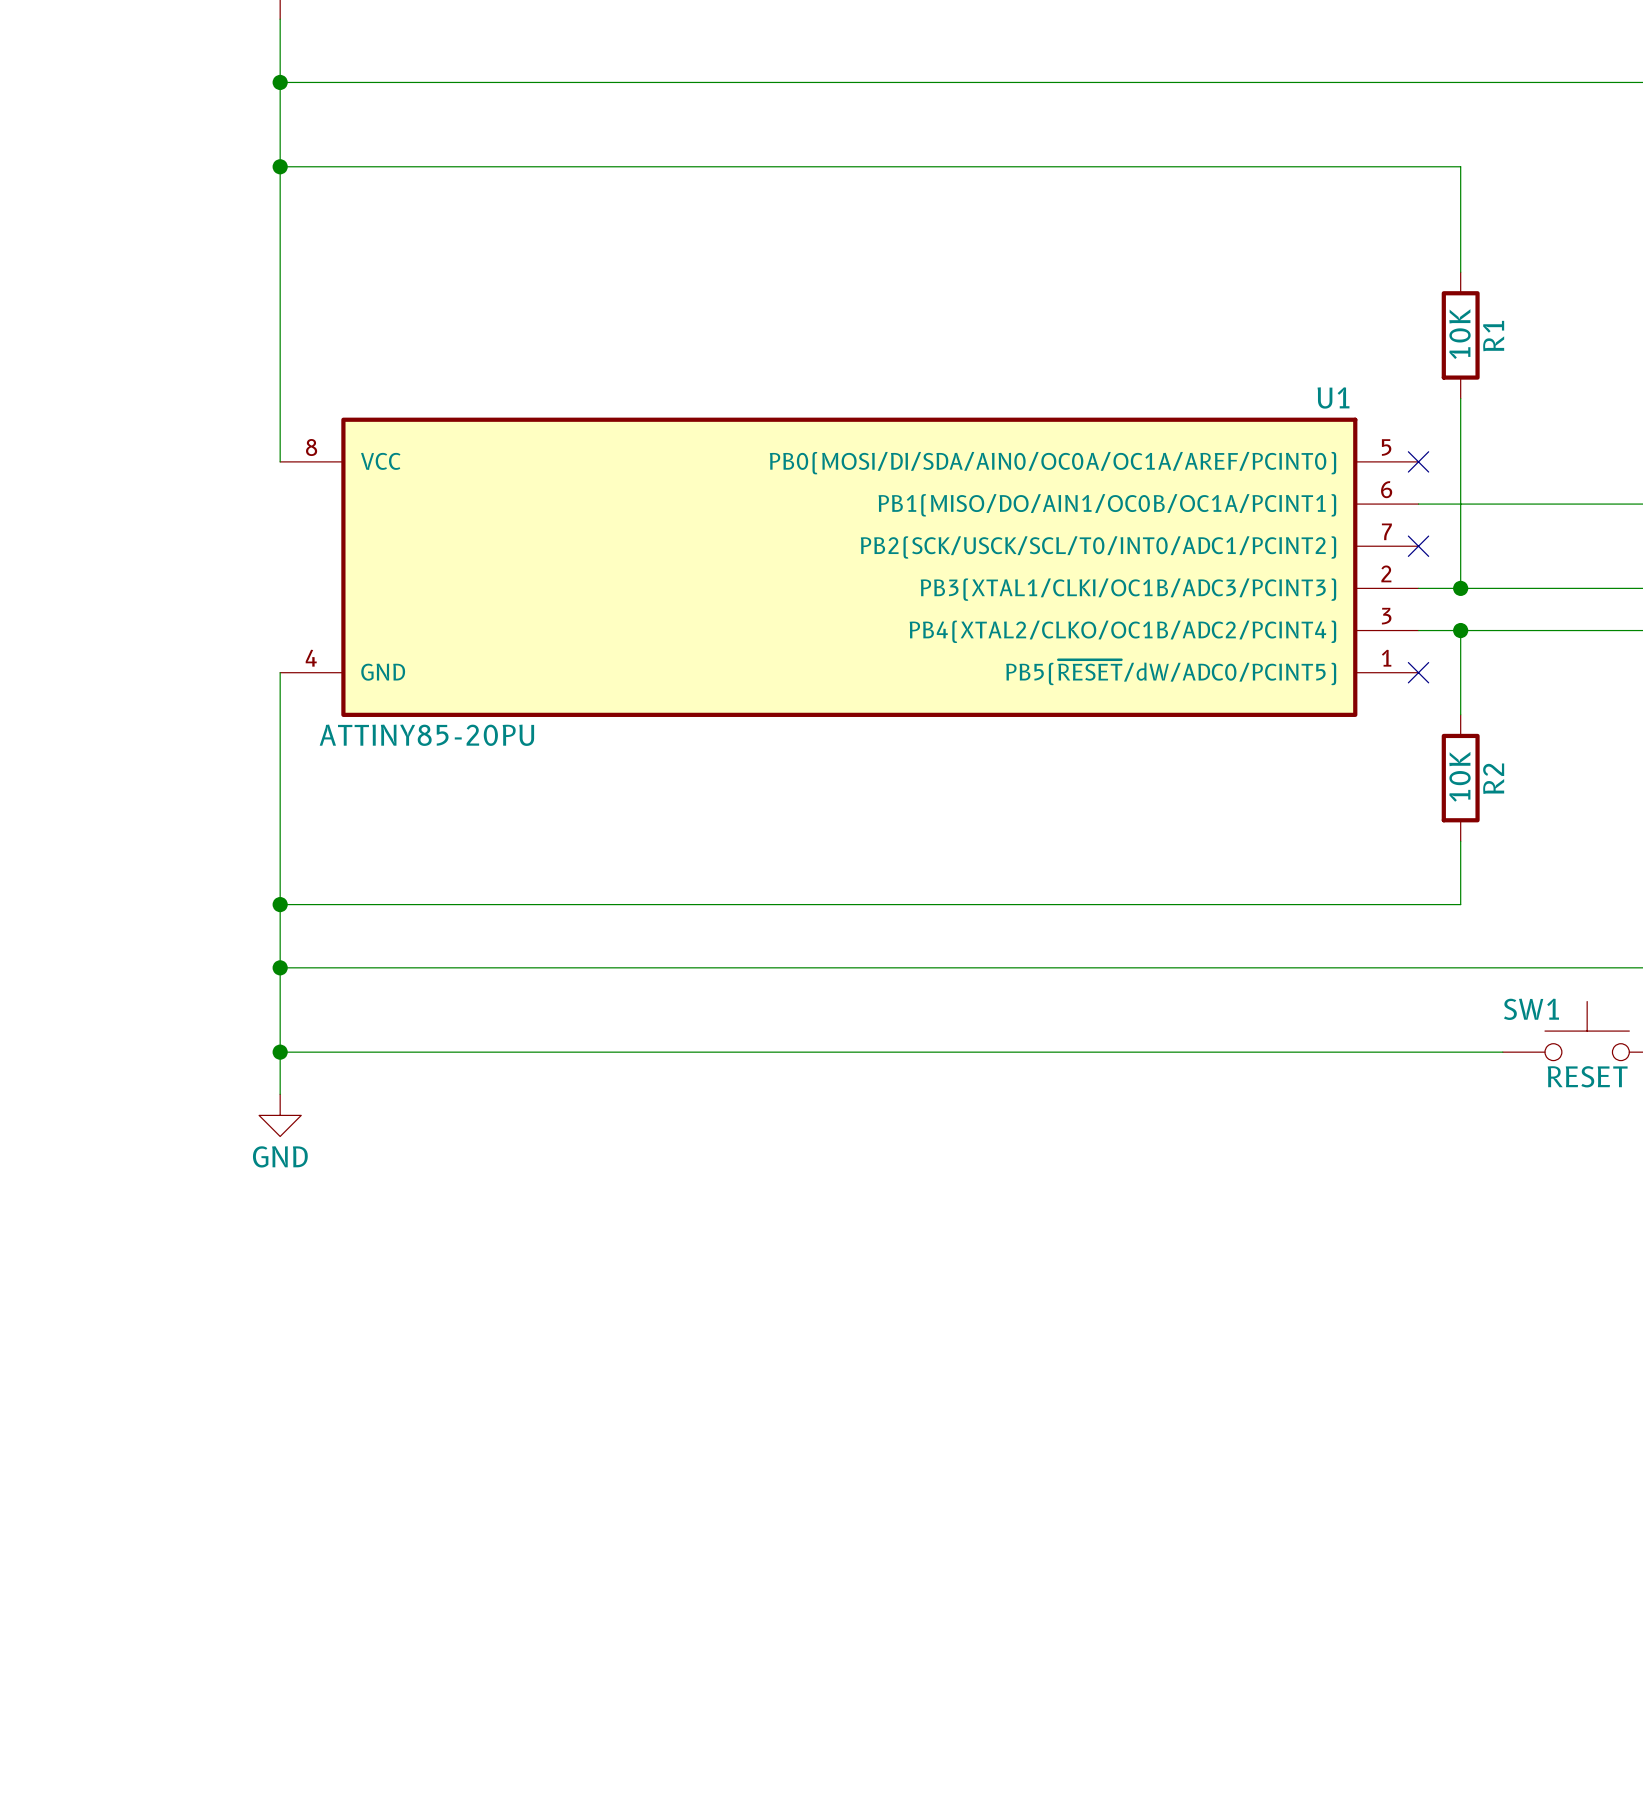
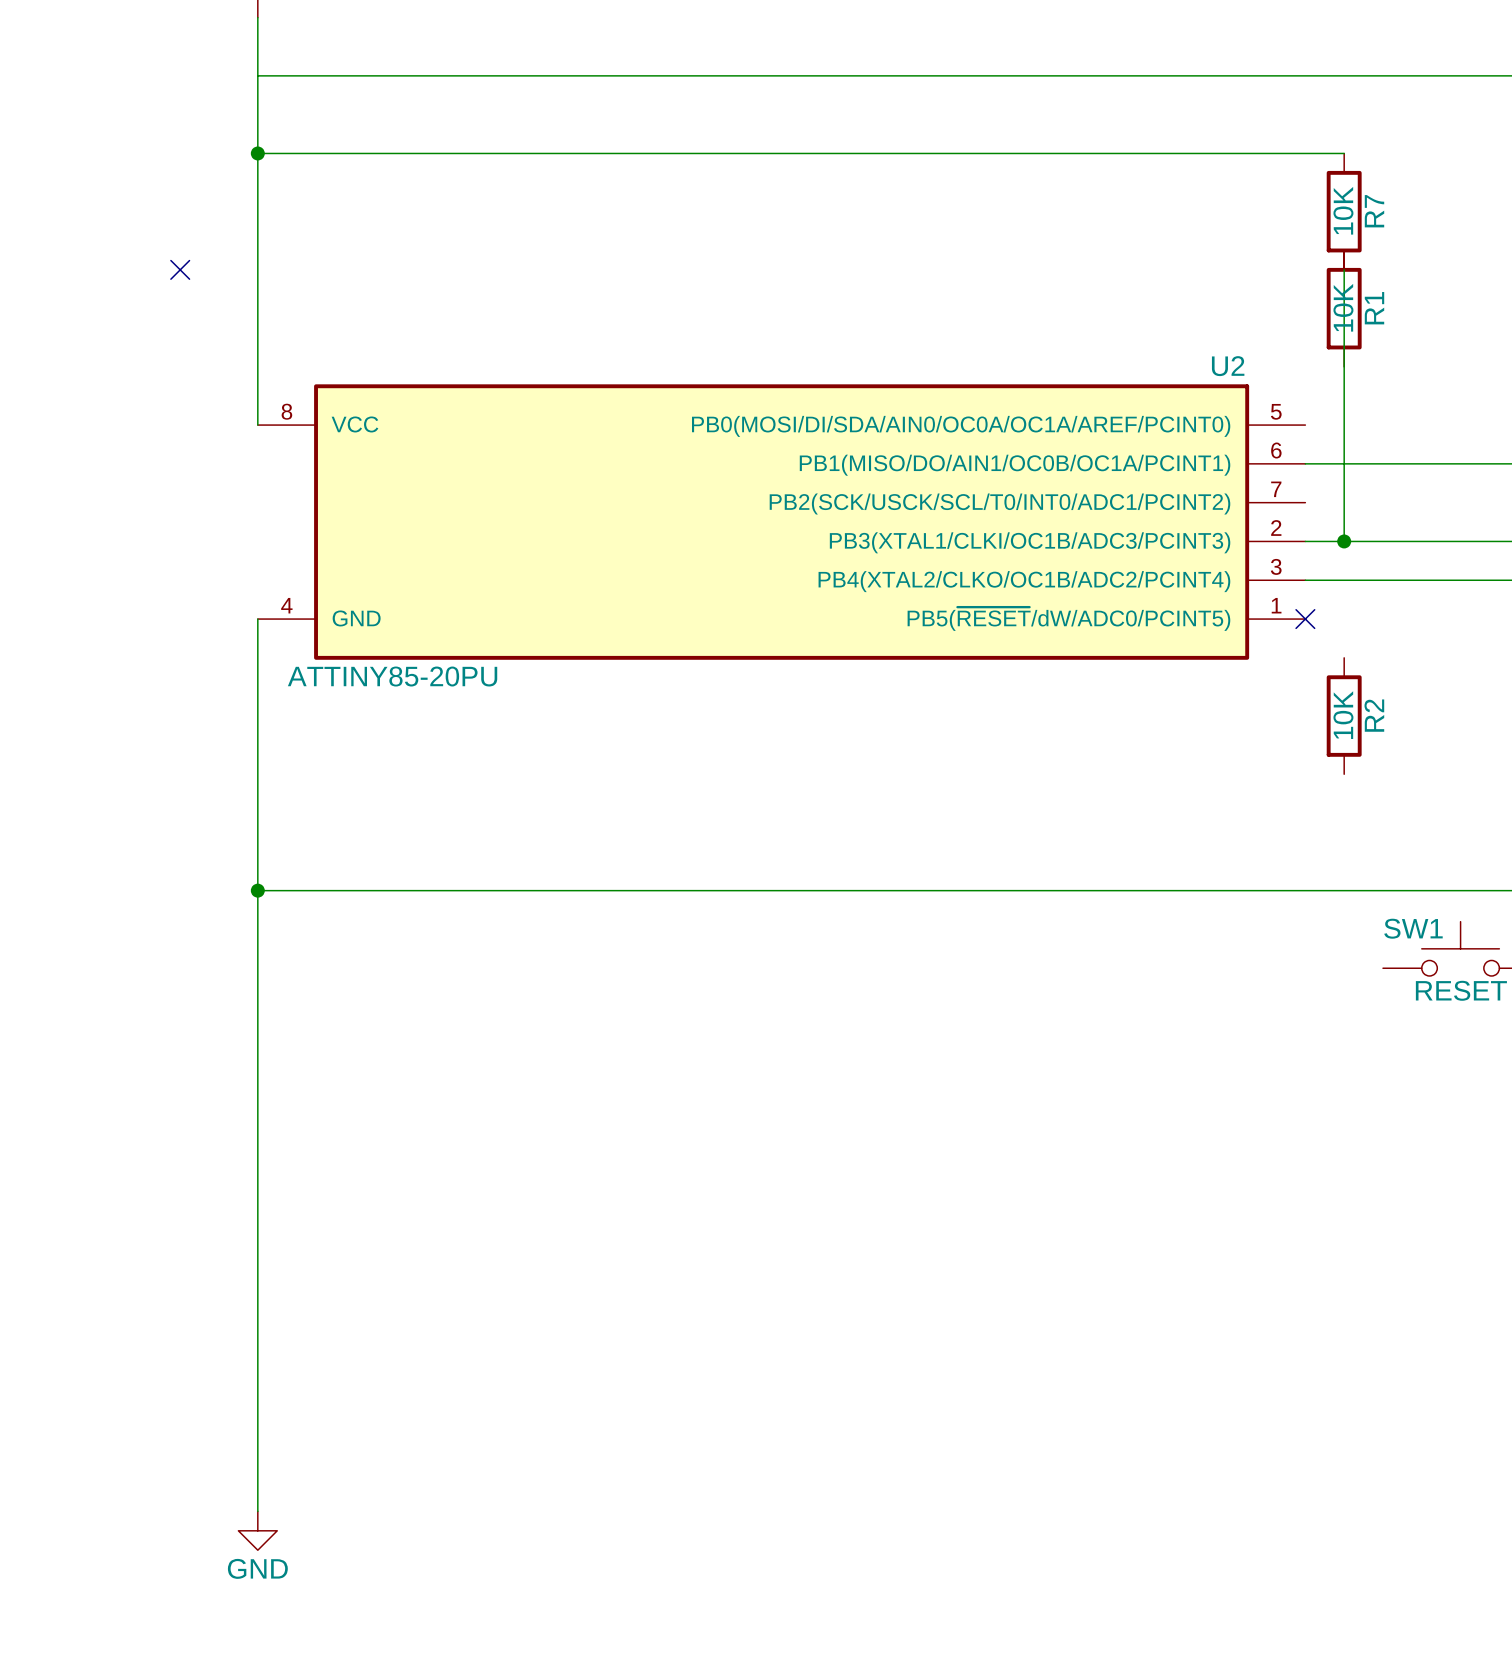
junction: (280, 82) -> none
wire: (1460, 166) (1460, 272) -> (1344, 269) (1344, 366)
R7: none -> 10K (1344, 211)
no-connect mark: none -> (180, 269)
U1 name: U1 (1333, 397) -> U2 (1228, 366)
no-connect mark: (1418, 461) -> none
no-connect mark: (1418, 546) -> none
wire: (1460, 630) (1460, 714) -> none
junction: (1460, 630) -> none
wire: (1460, 841) (1460, 904) (280, 904) -> none
junction: (280, 904) -> none
wire: (280, 1052) (1502, 1052) -> none
junction: (280, 1052) -> none
wire: none -> (257, 1007) (257, 1511)
power symbol: GND (280, 1115) -> none
power symbol: none -> GND (257, 1530)

